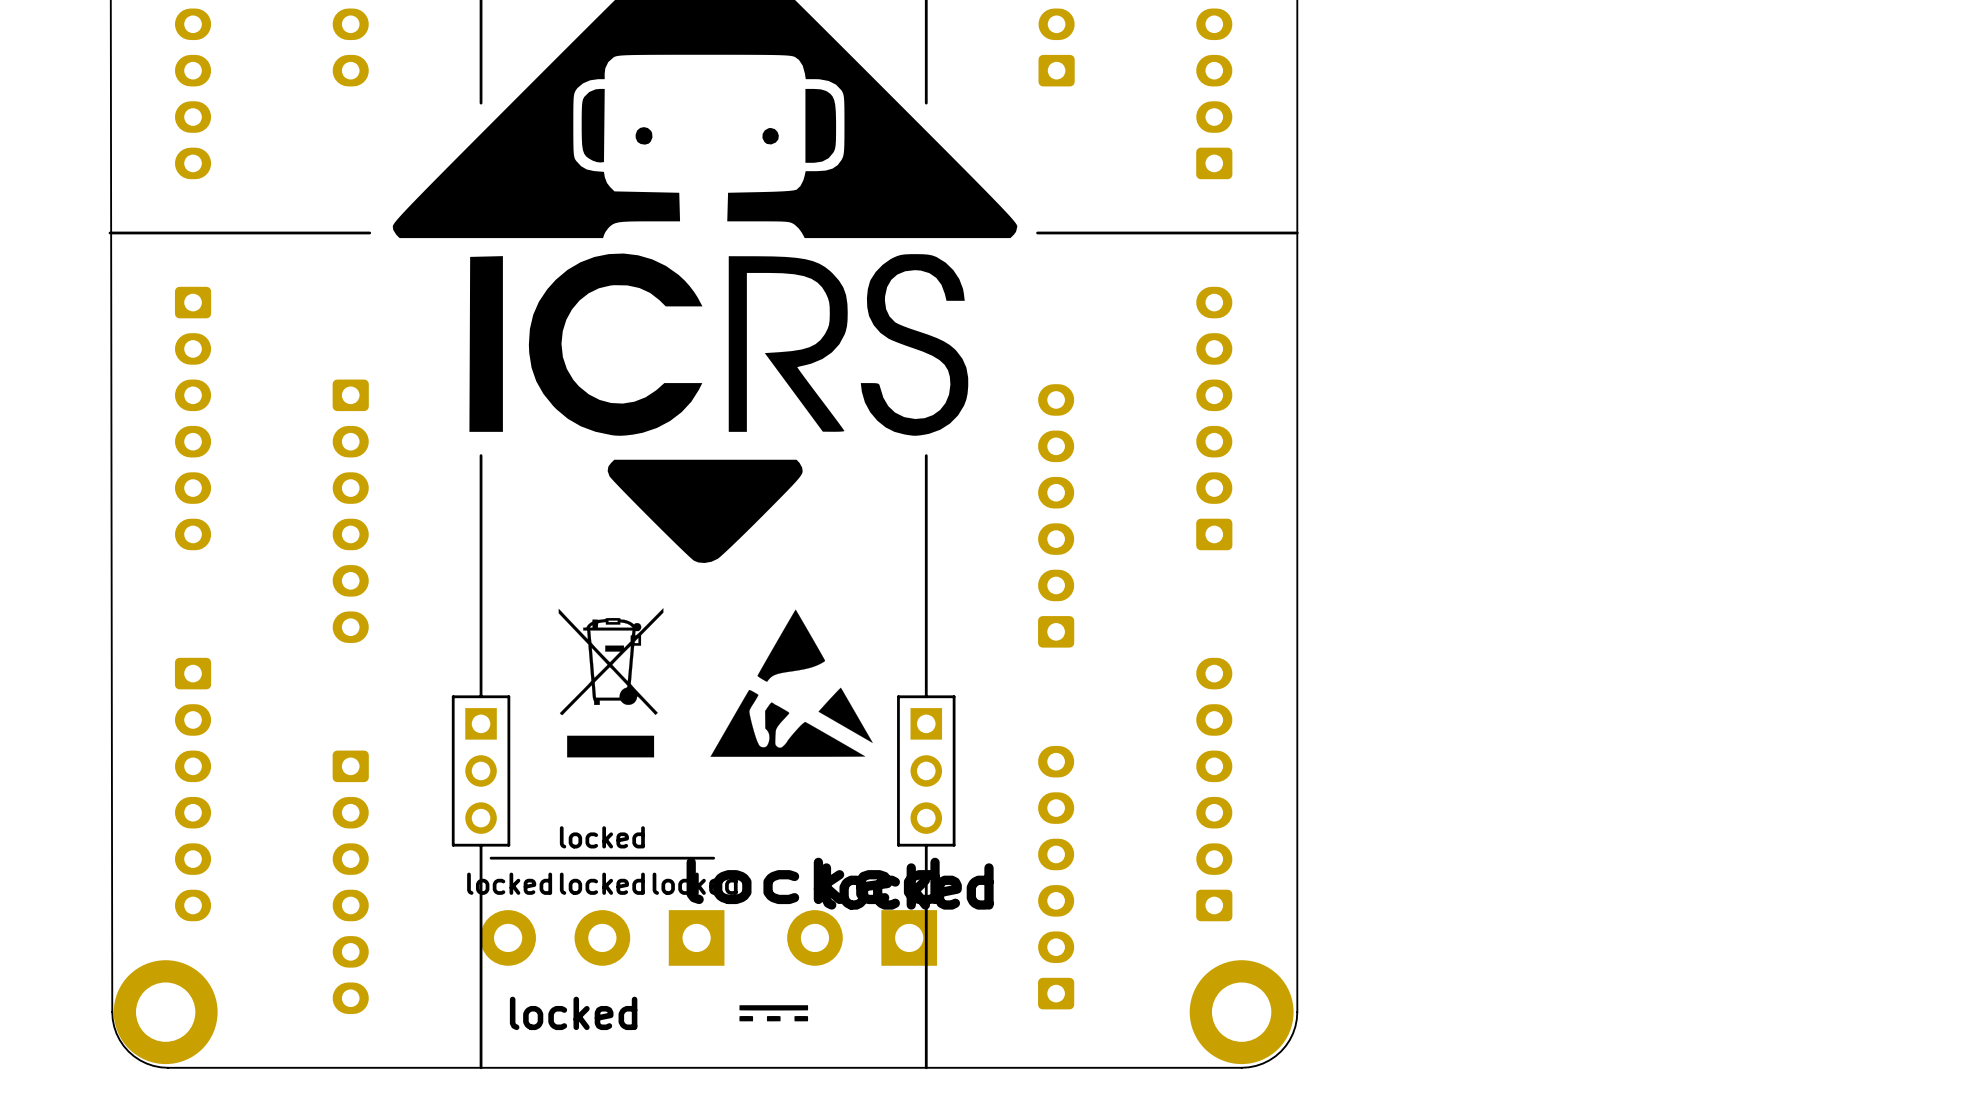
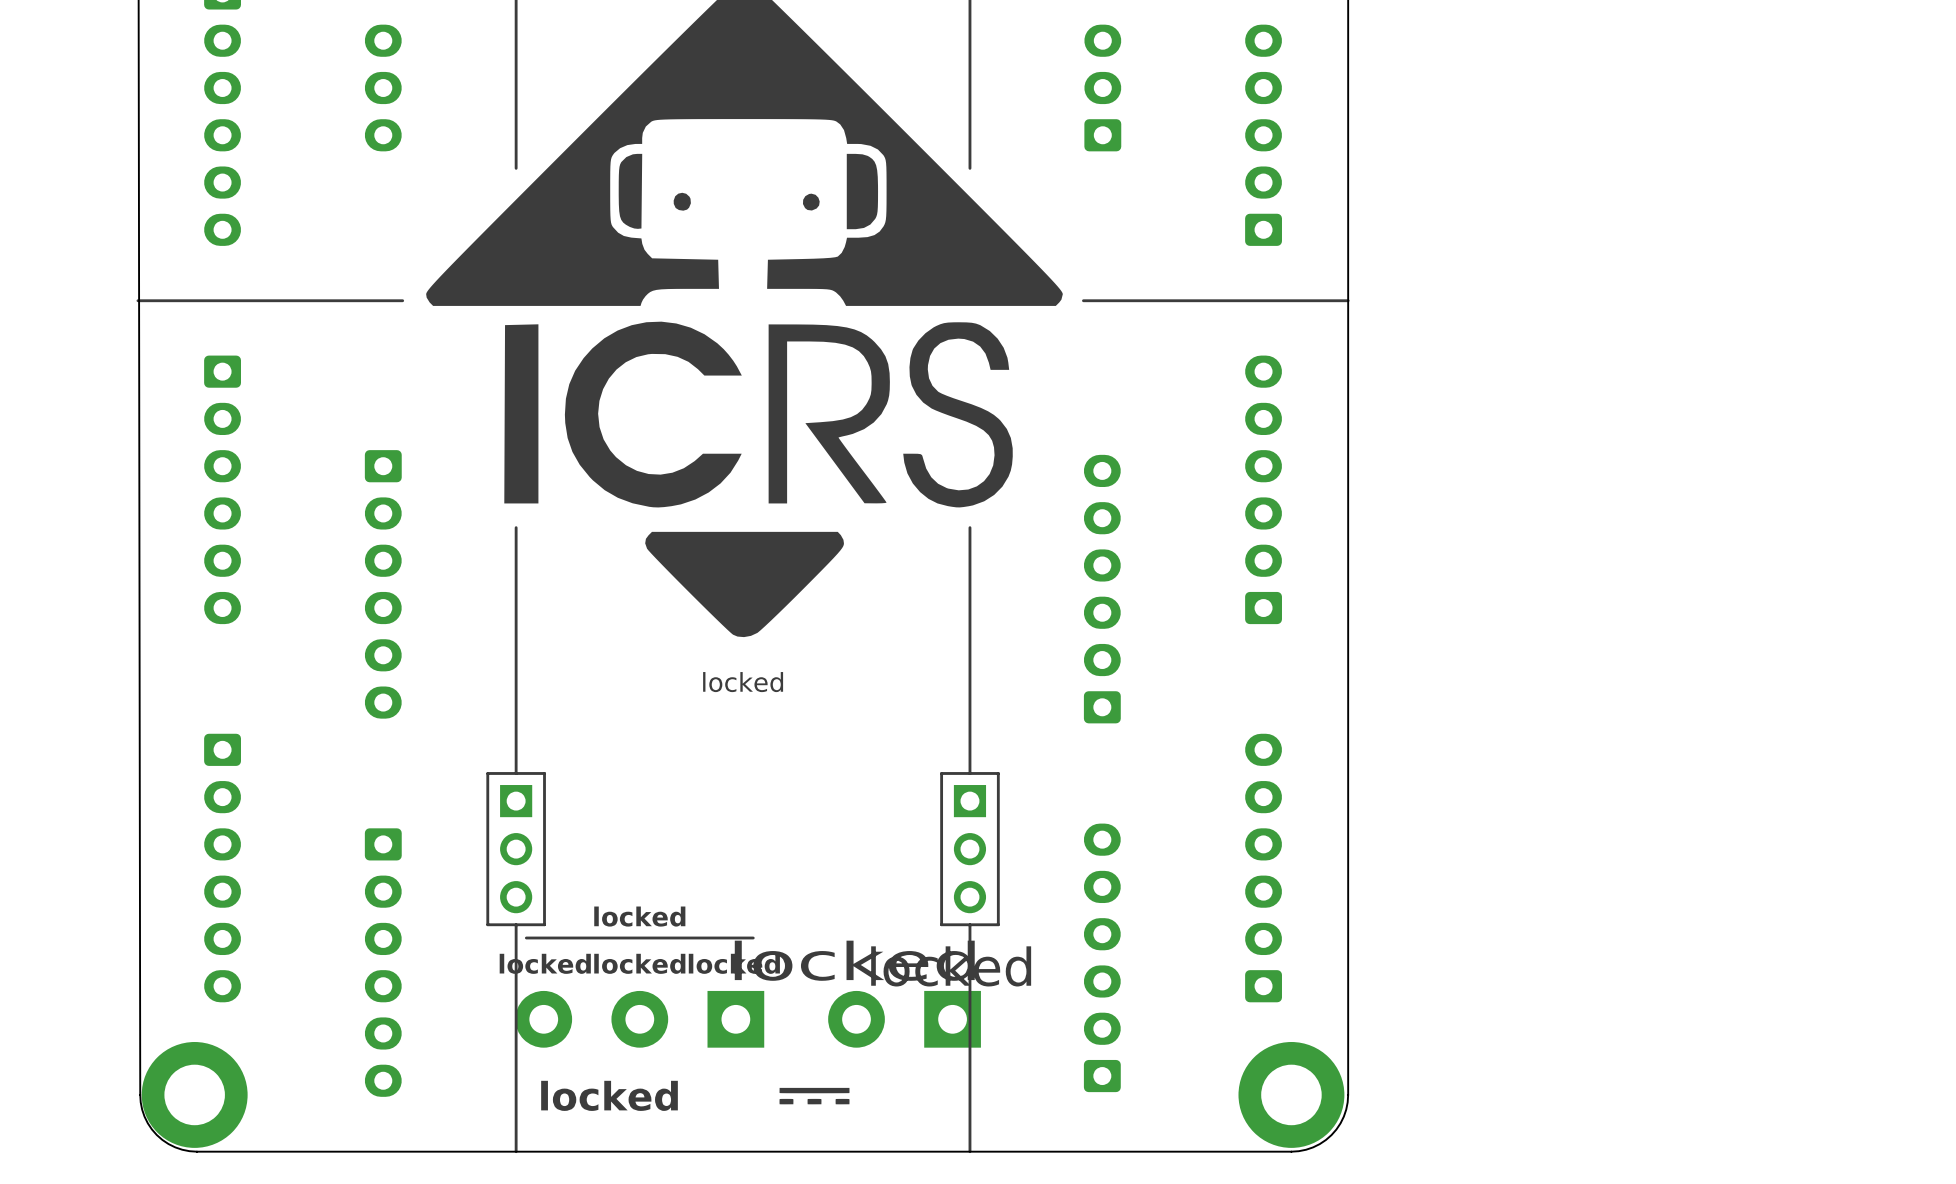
text: none -> locked (743, 682)
drawing: [558, 608, 664, 758] -> none
drawing: [710, 609, 873, 757] -> none

